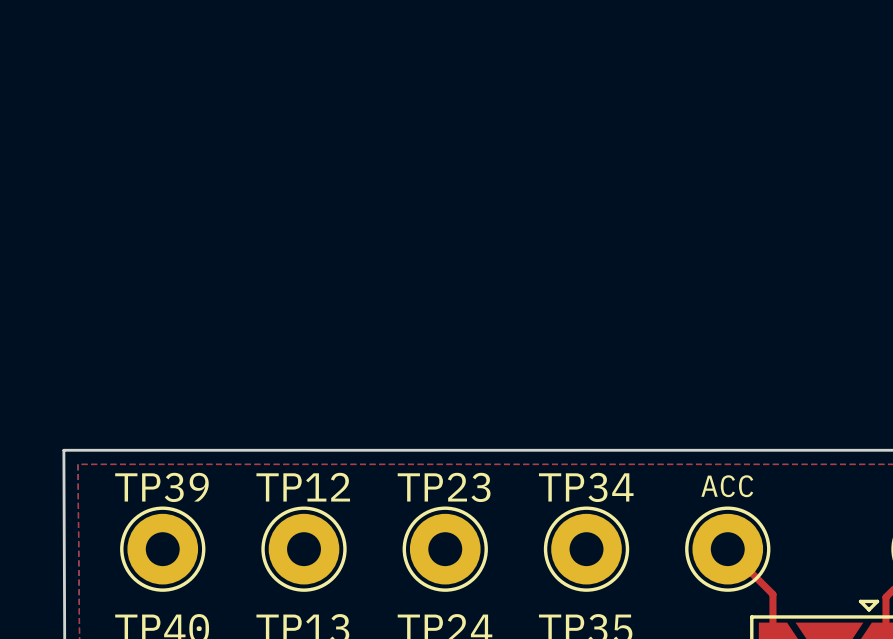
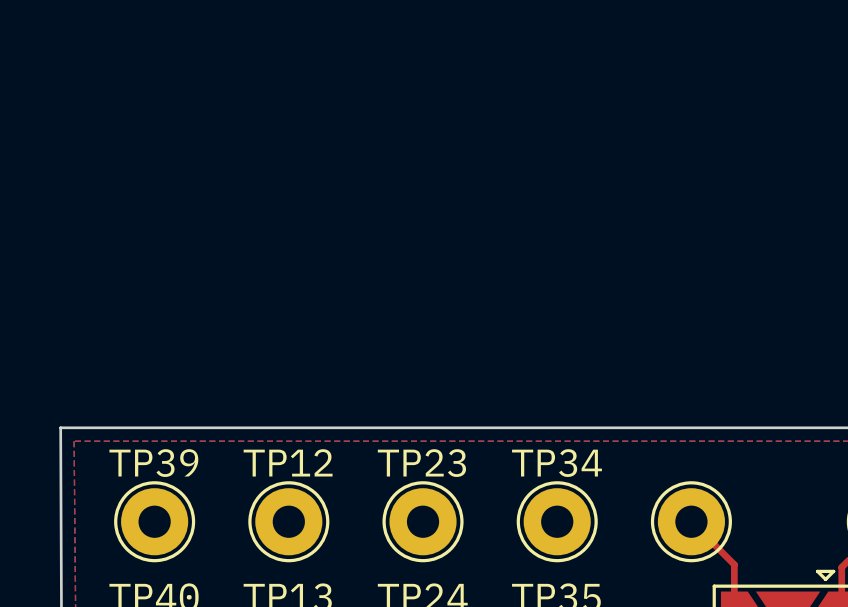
part text: ACC (727, 486) -> none

